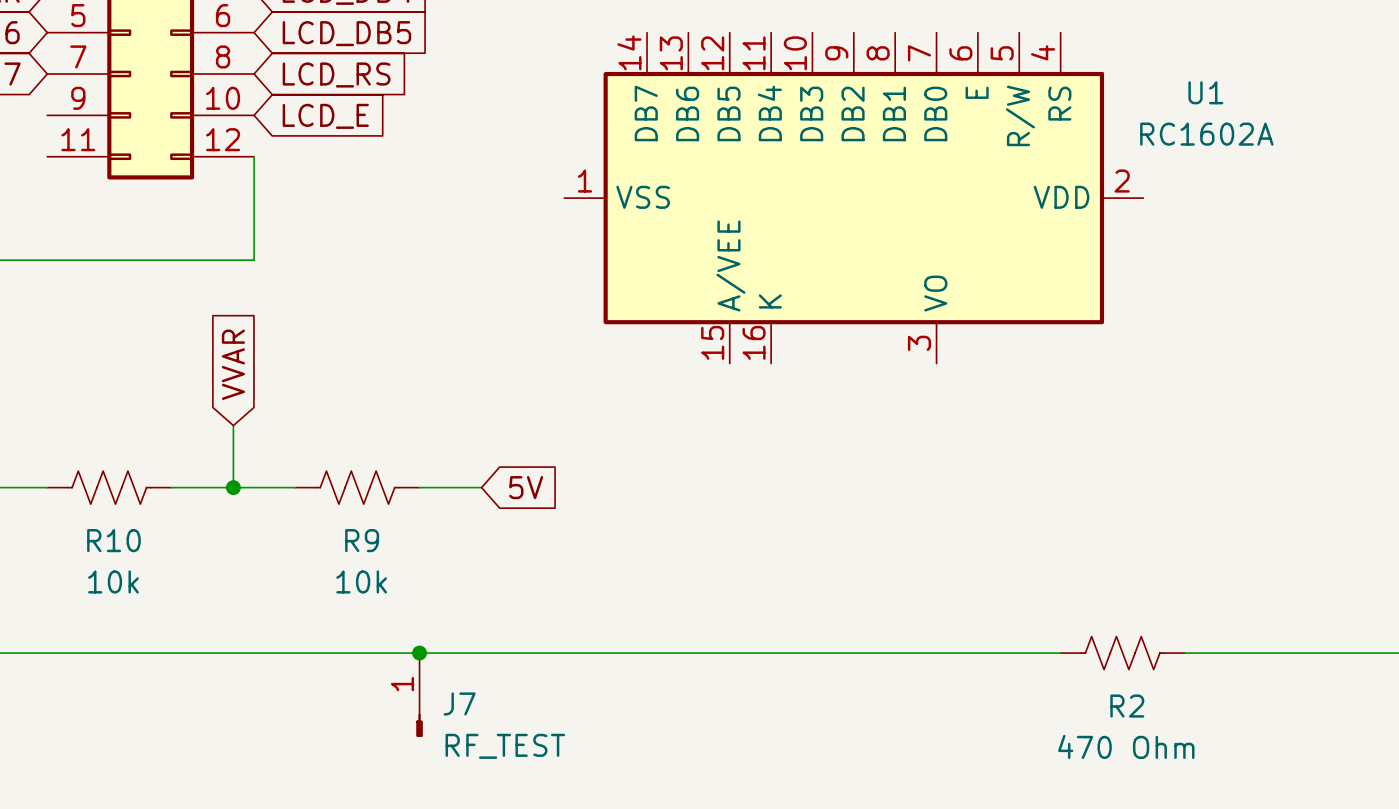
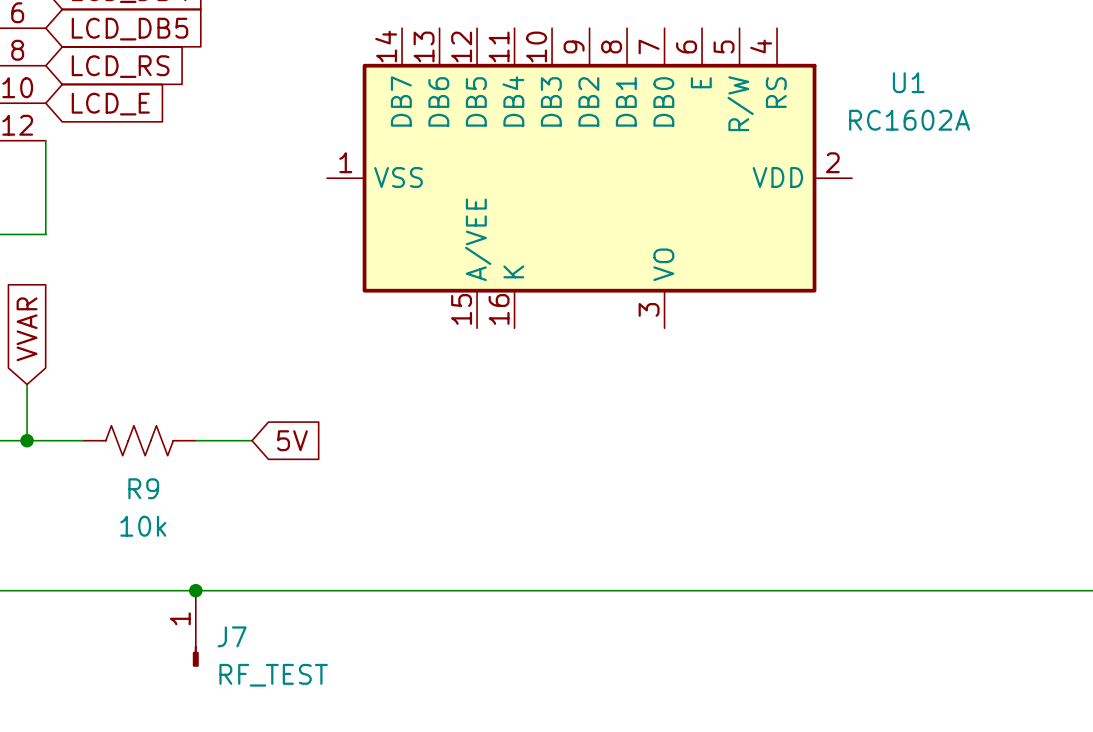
wire: none -> (777, 590) (889, 590)
R2: 470 Ohm (1122, 653) -> none

